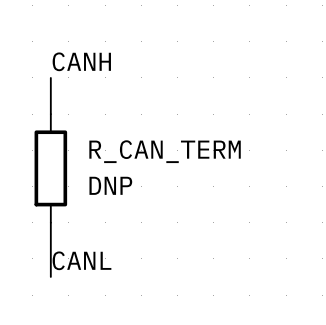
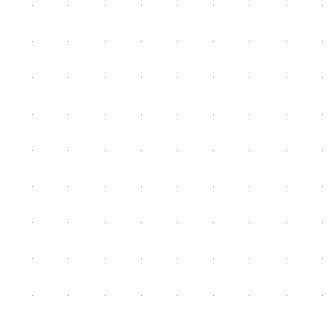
label: CANH (81, 61) -> none
wire: (50, 77) (50, 114) -> none
R_CAN_TERM: DNP (50, 168) -> none
wire: (50, 222) (50, 276) -> none
label: CANL (82, 260) -> none

